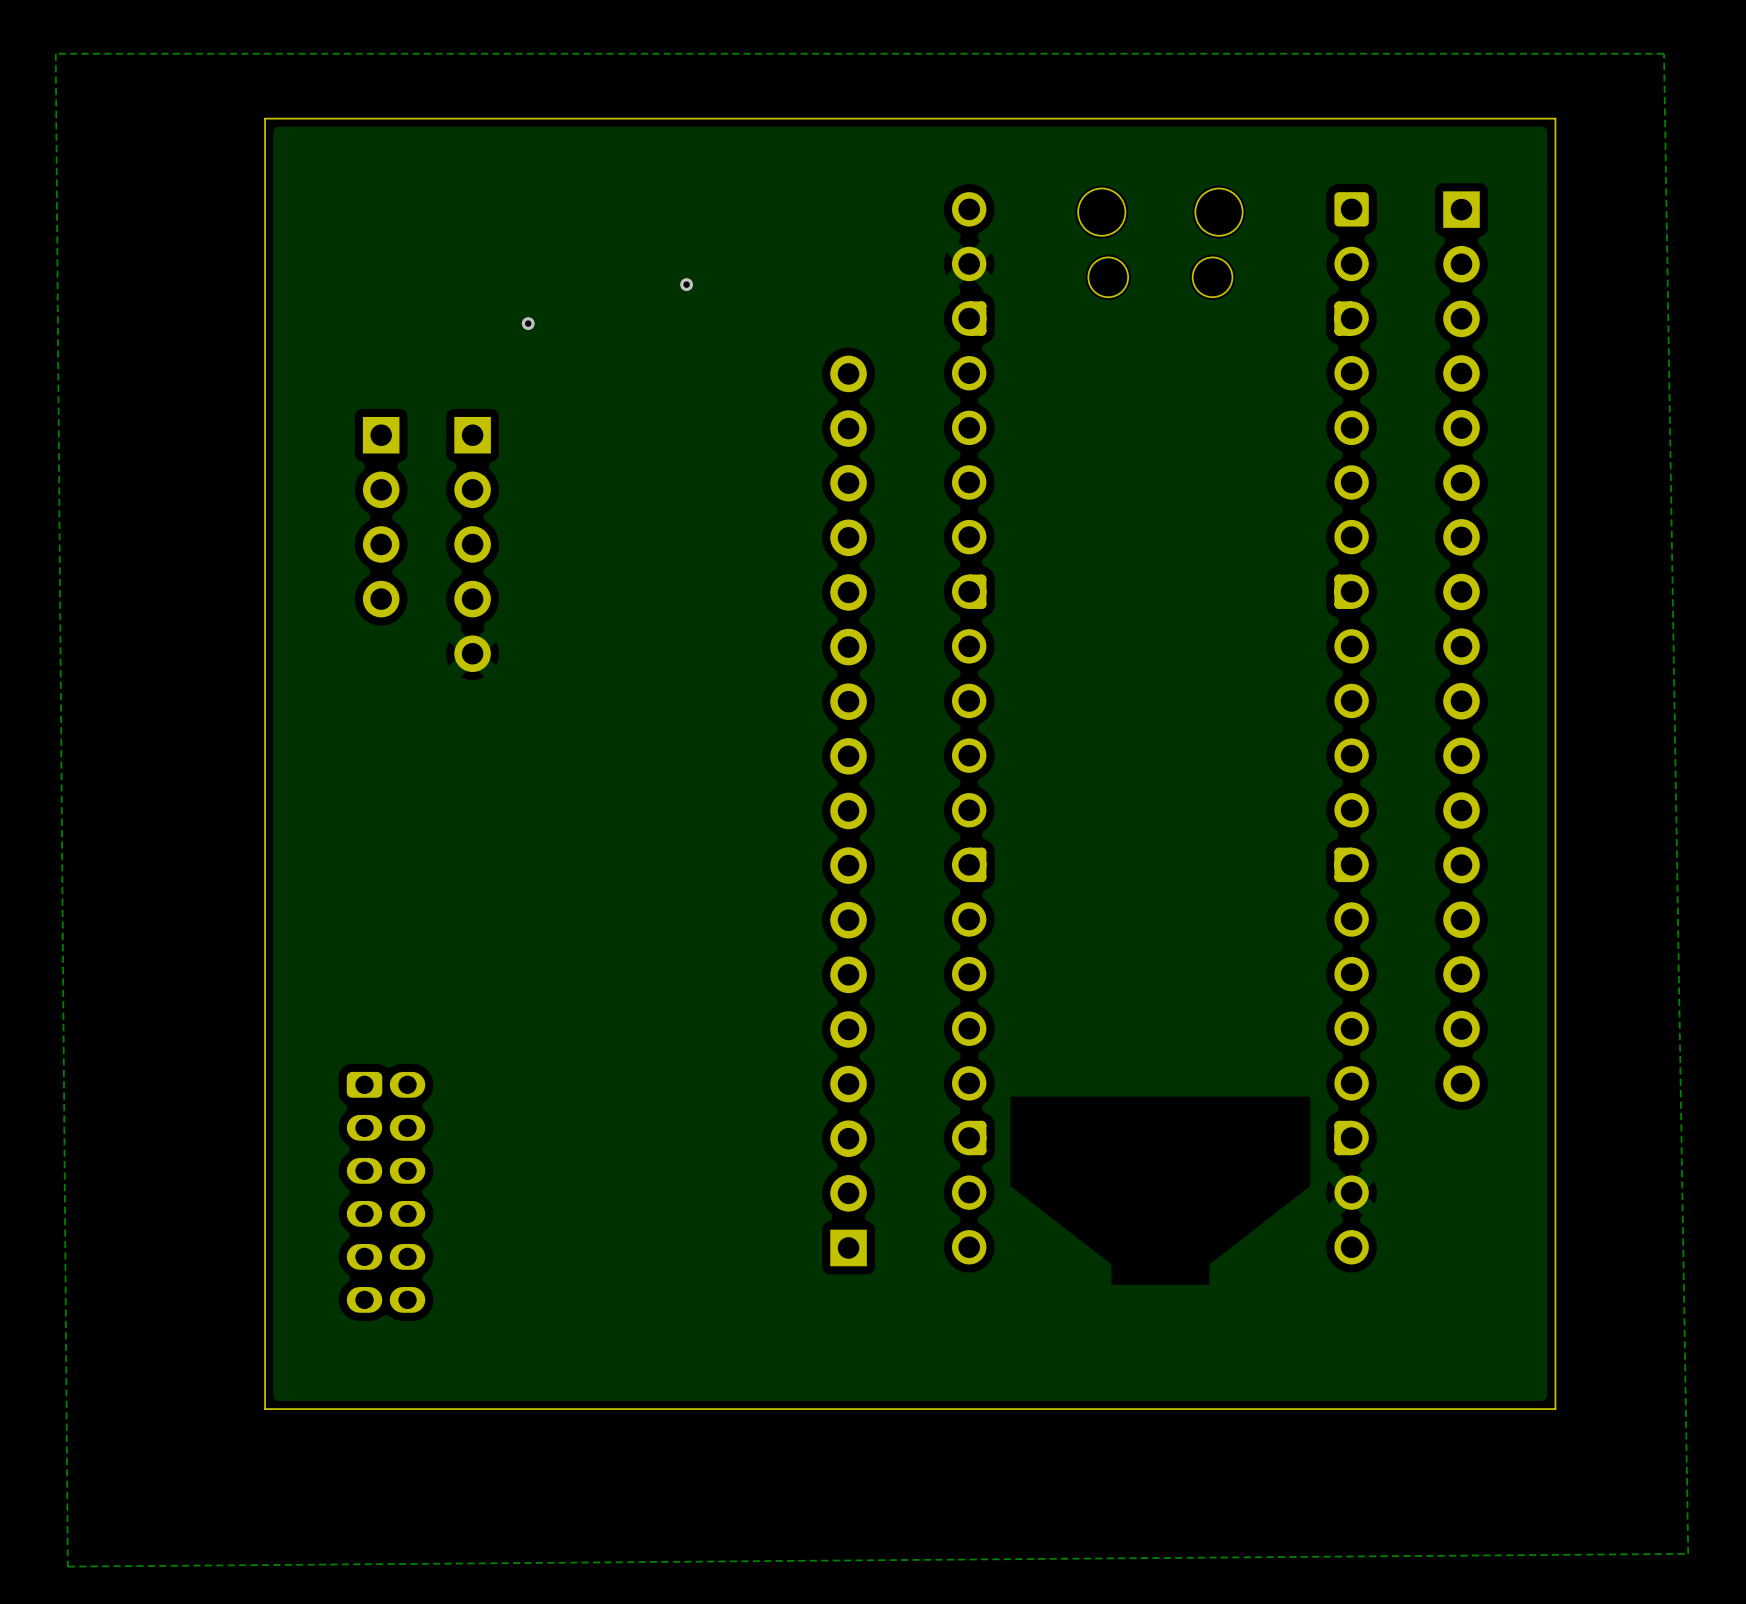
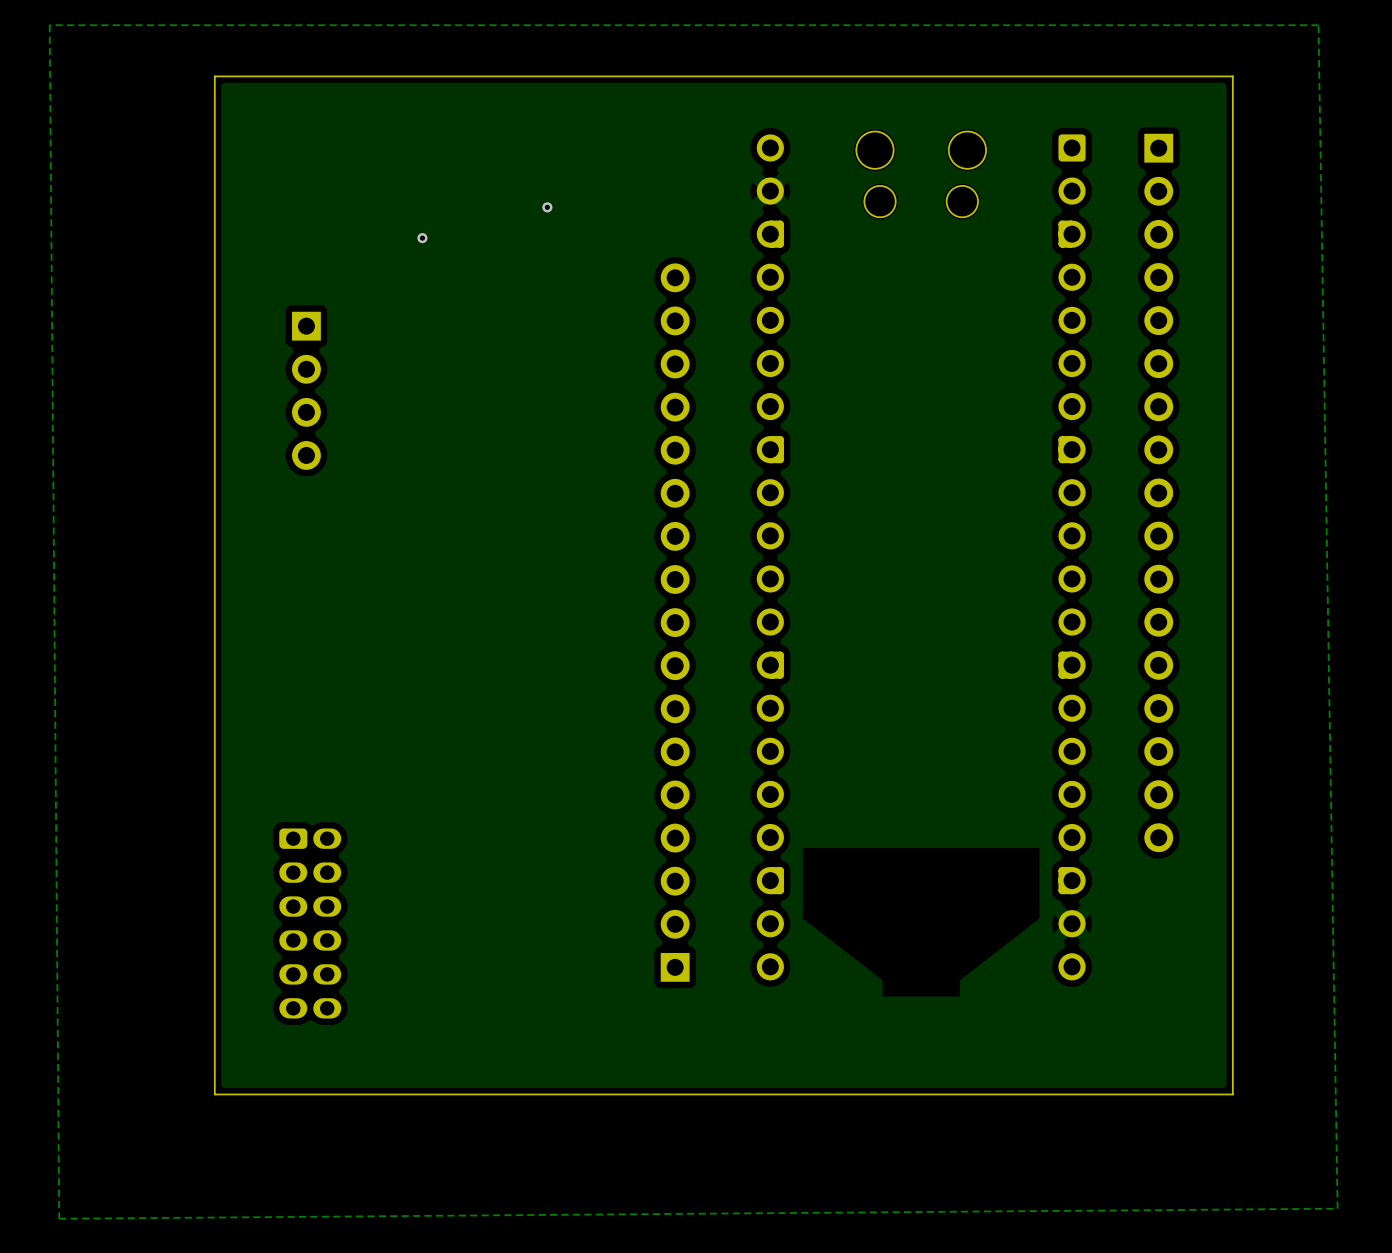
part: (472, 544) -> none

